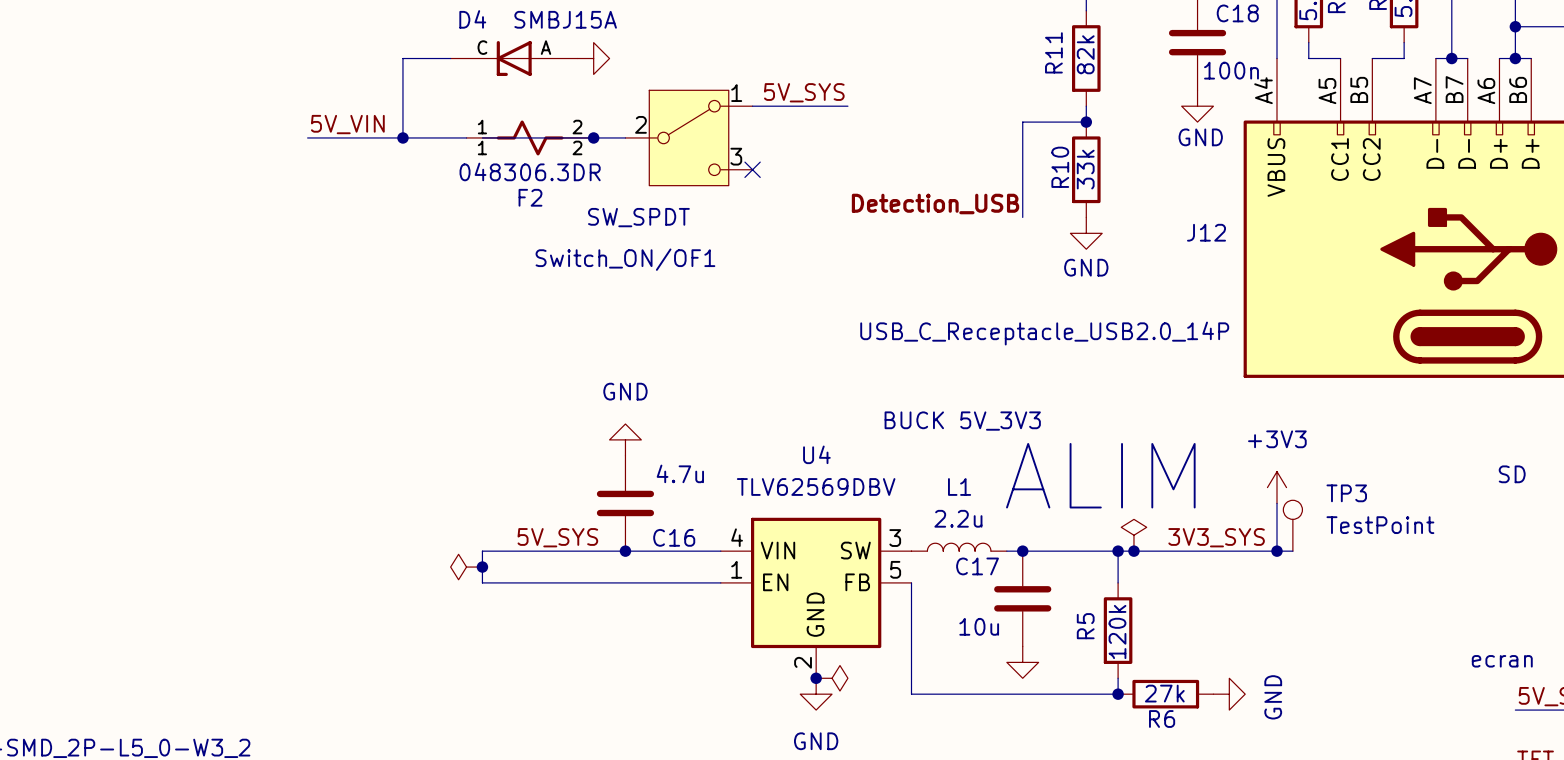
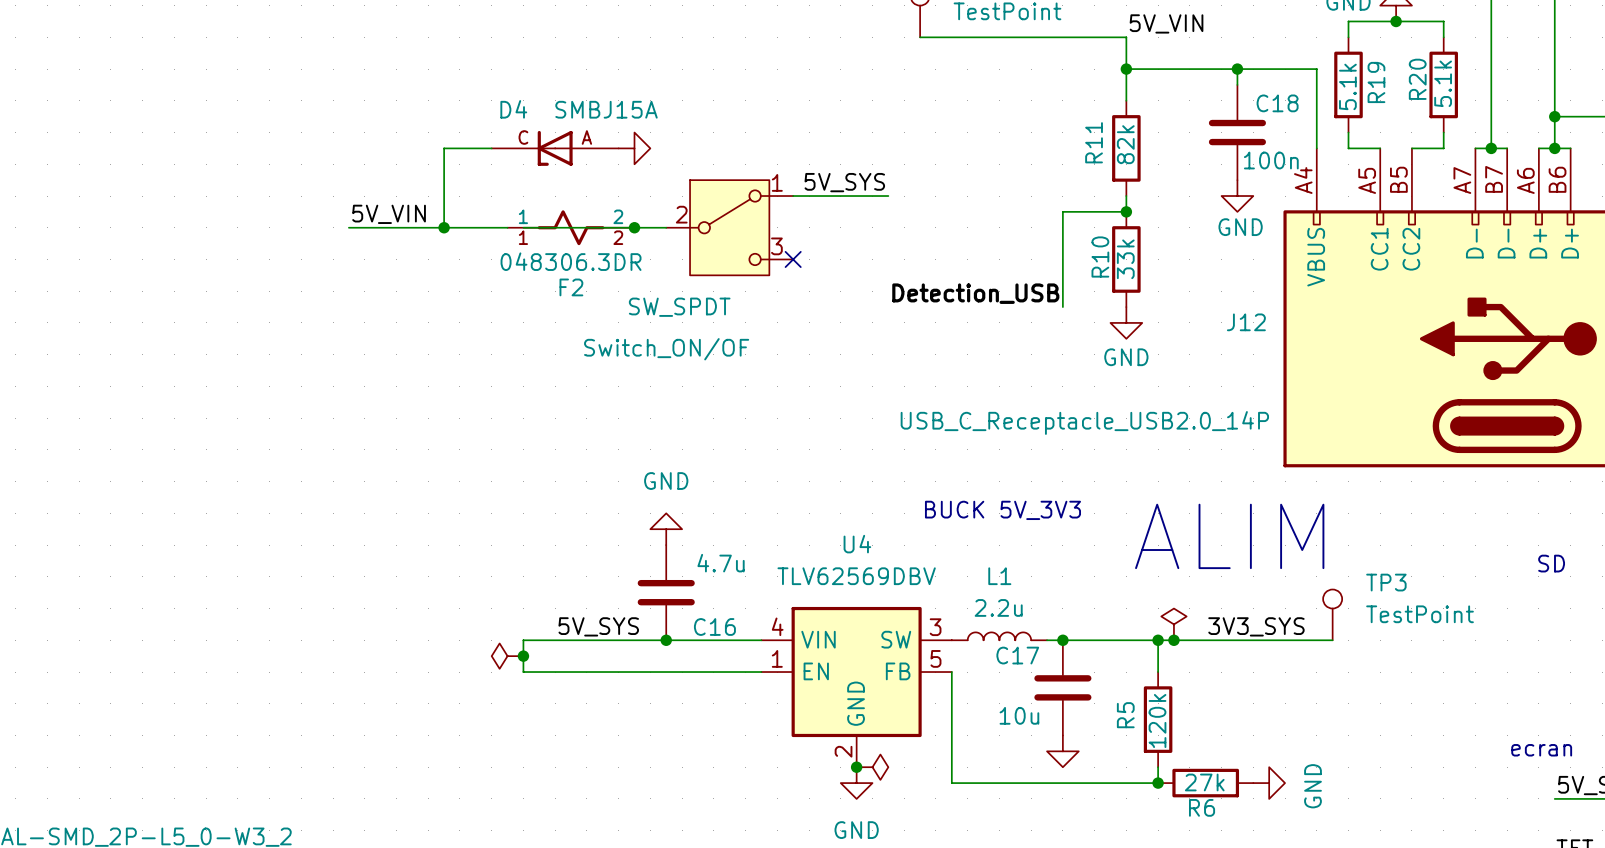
Switch_ON/OF1 name: Switch_ON/OF1 (625, 259) -> Switch_ON/OF (666, 349)
text position: ALIM (1100, 475) -> ALIM (1229, 536)
power symbol: +3V3 (1277, 487) -> none
wire: (1277, 503) (1277, 551) -> none
junction: (1277, 551) -> none

